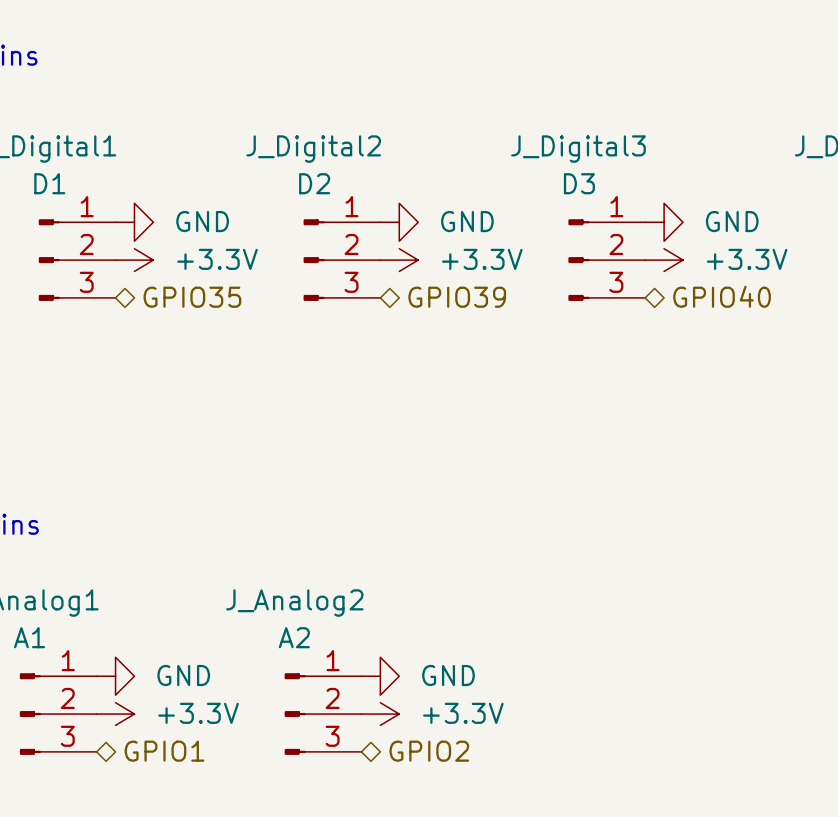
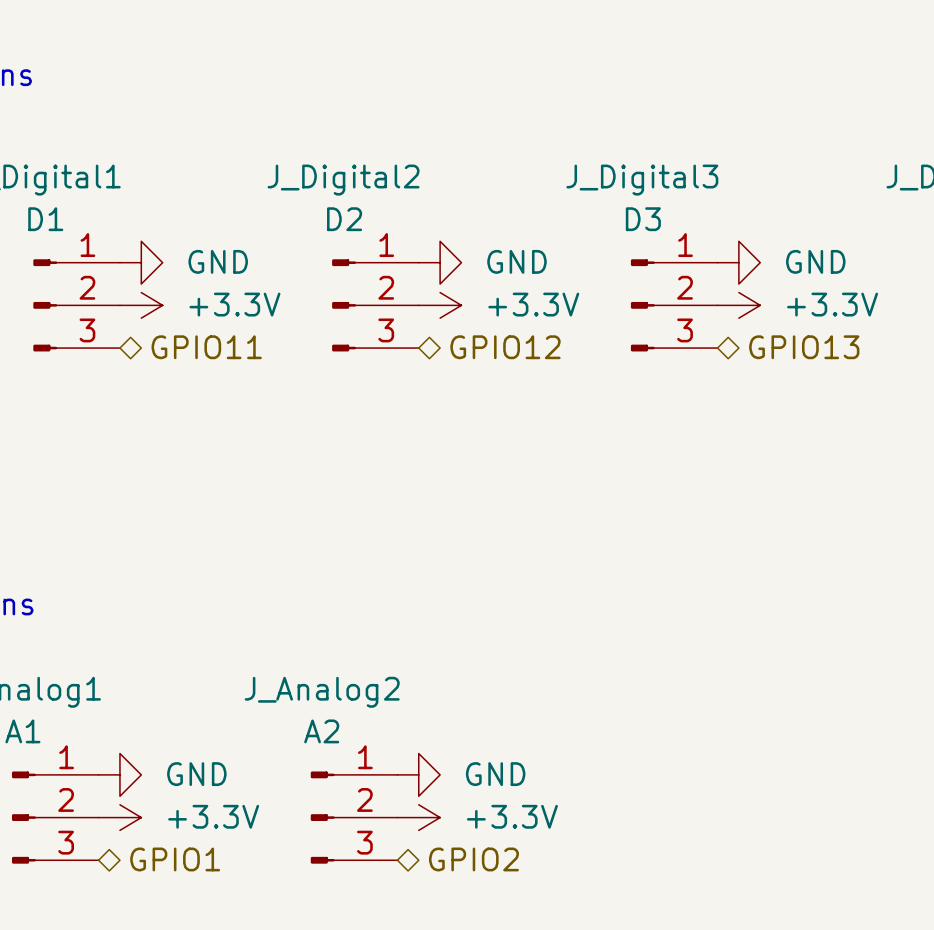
hierarchical label: GPIO40 (722, 296) -> GPIO13 (804, 347)
hierarchical label: GPIO35 (192, 297) -> GPIO11 (206, 347)
hierarchical label: GPIO39 (457, 297) -> GPIO12 (505, 347)

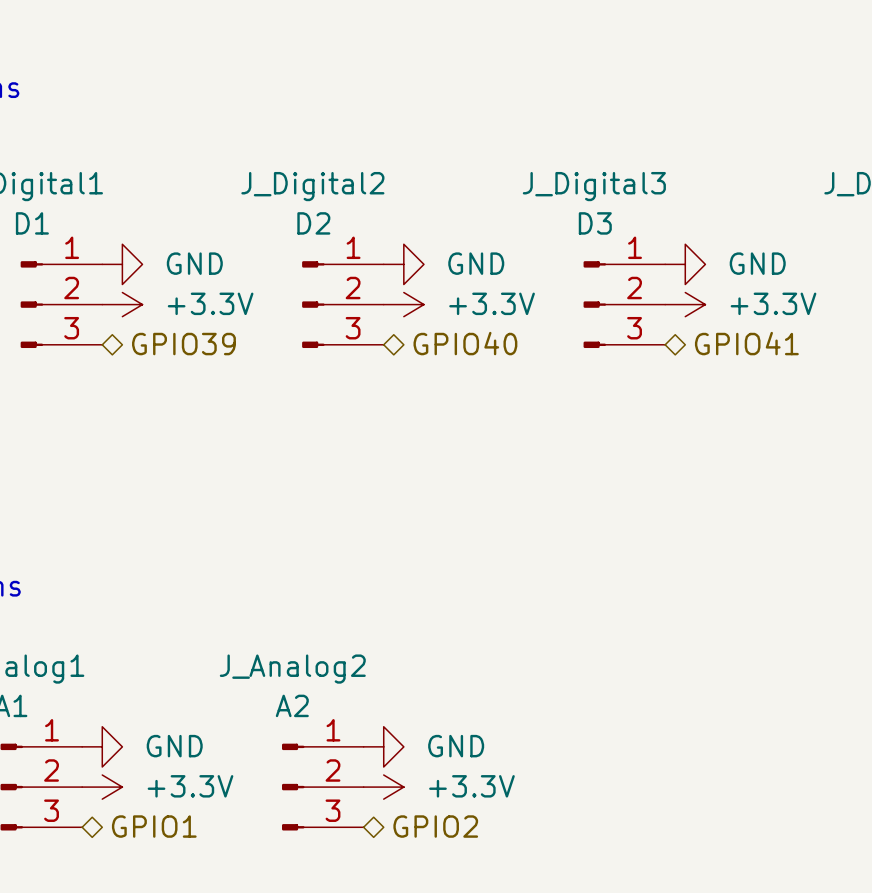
hierarchical label: GPIO11 (206, 347) -> GPIO39 (183, 344)
hierarchical label: GPIO12 (505, 347) -> GPIO40 (465, 343)
hierarchical label: GPIO13 (804, 347) -> GPIO41 (746, 343)

